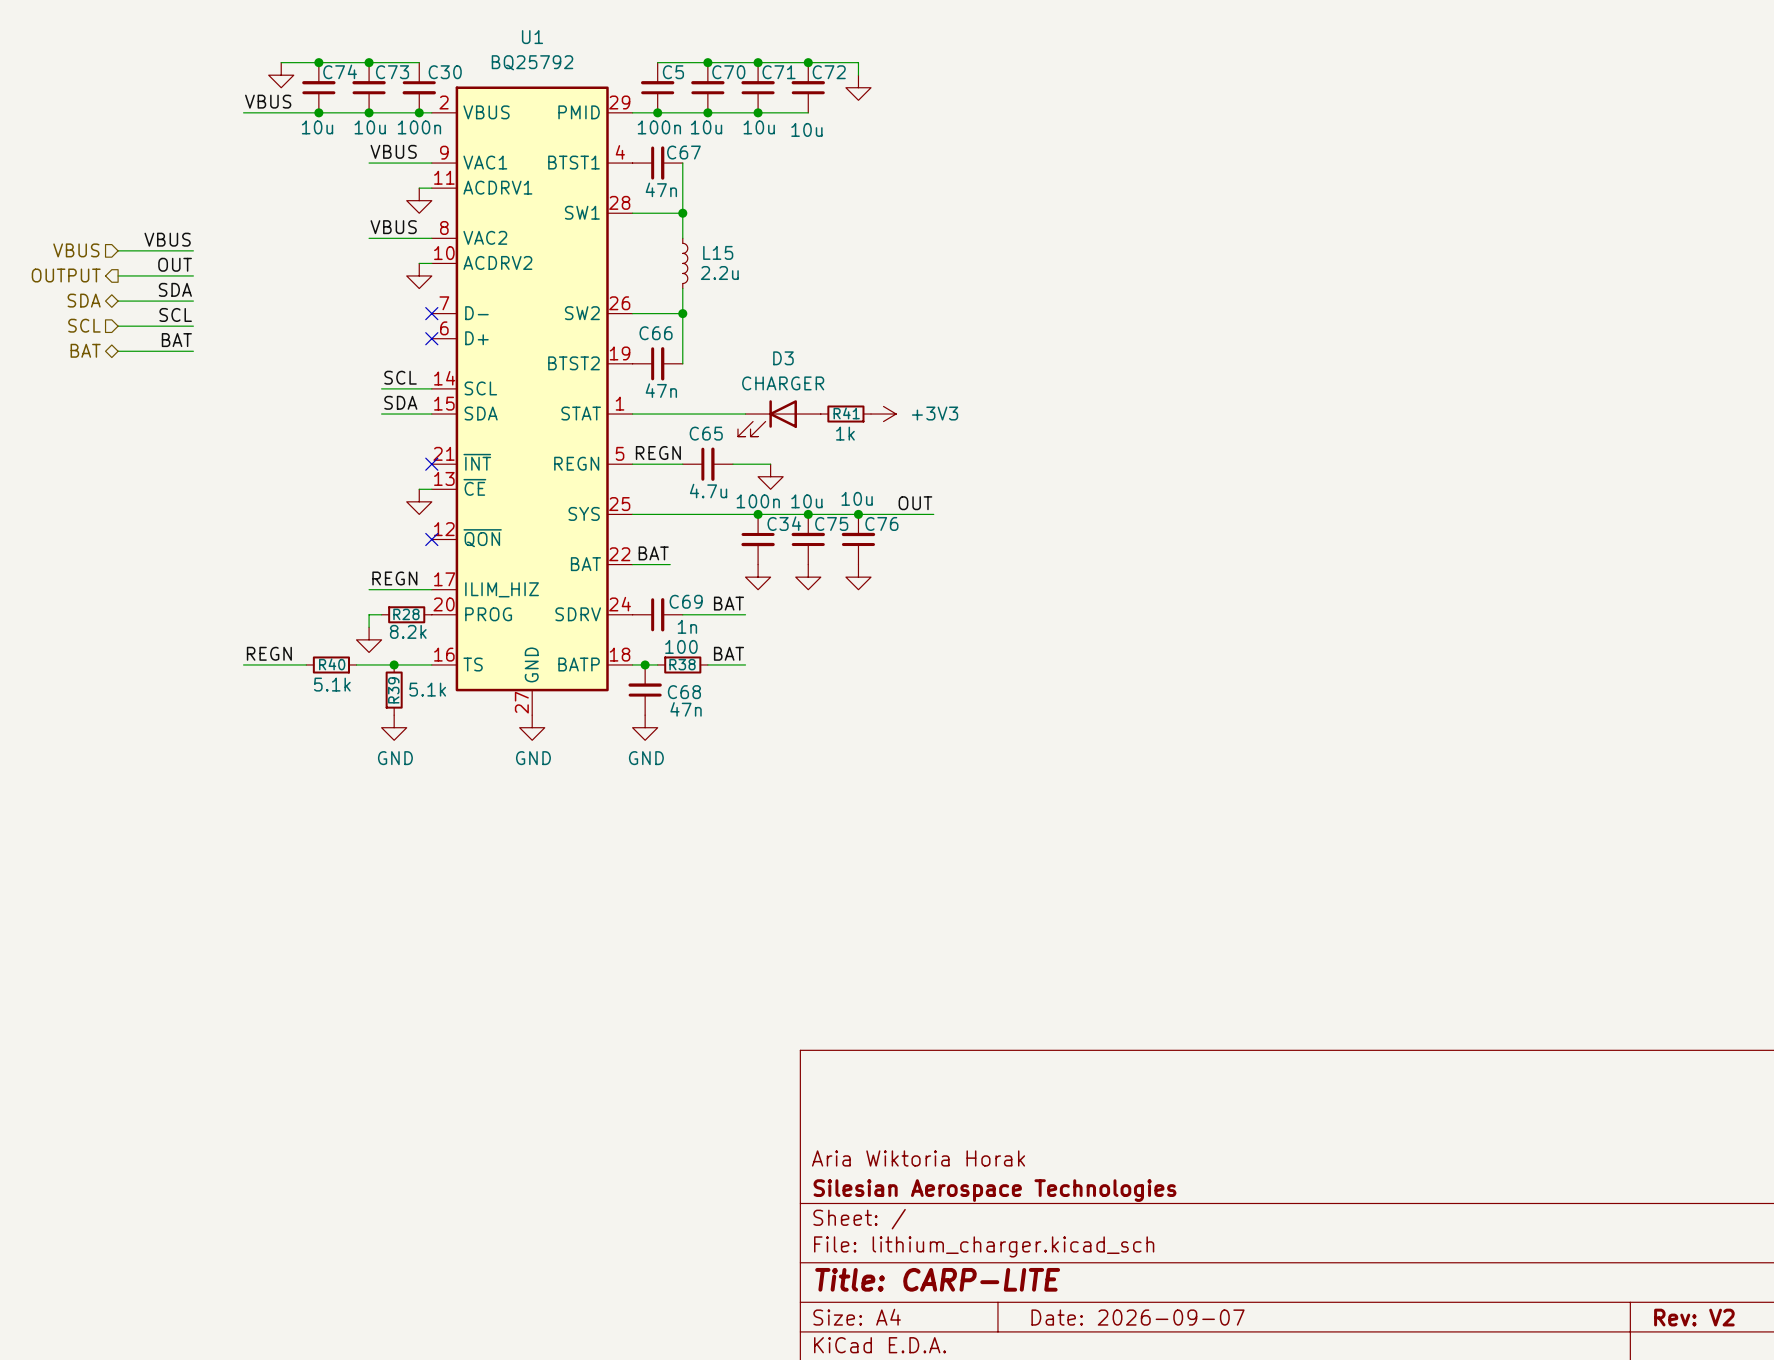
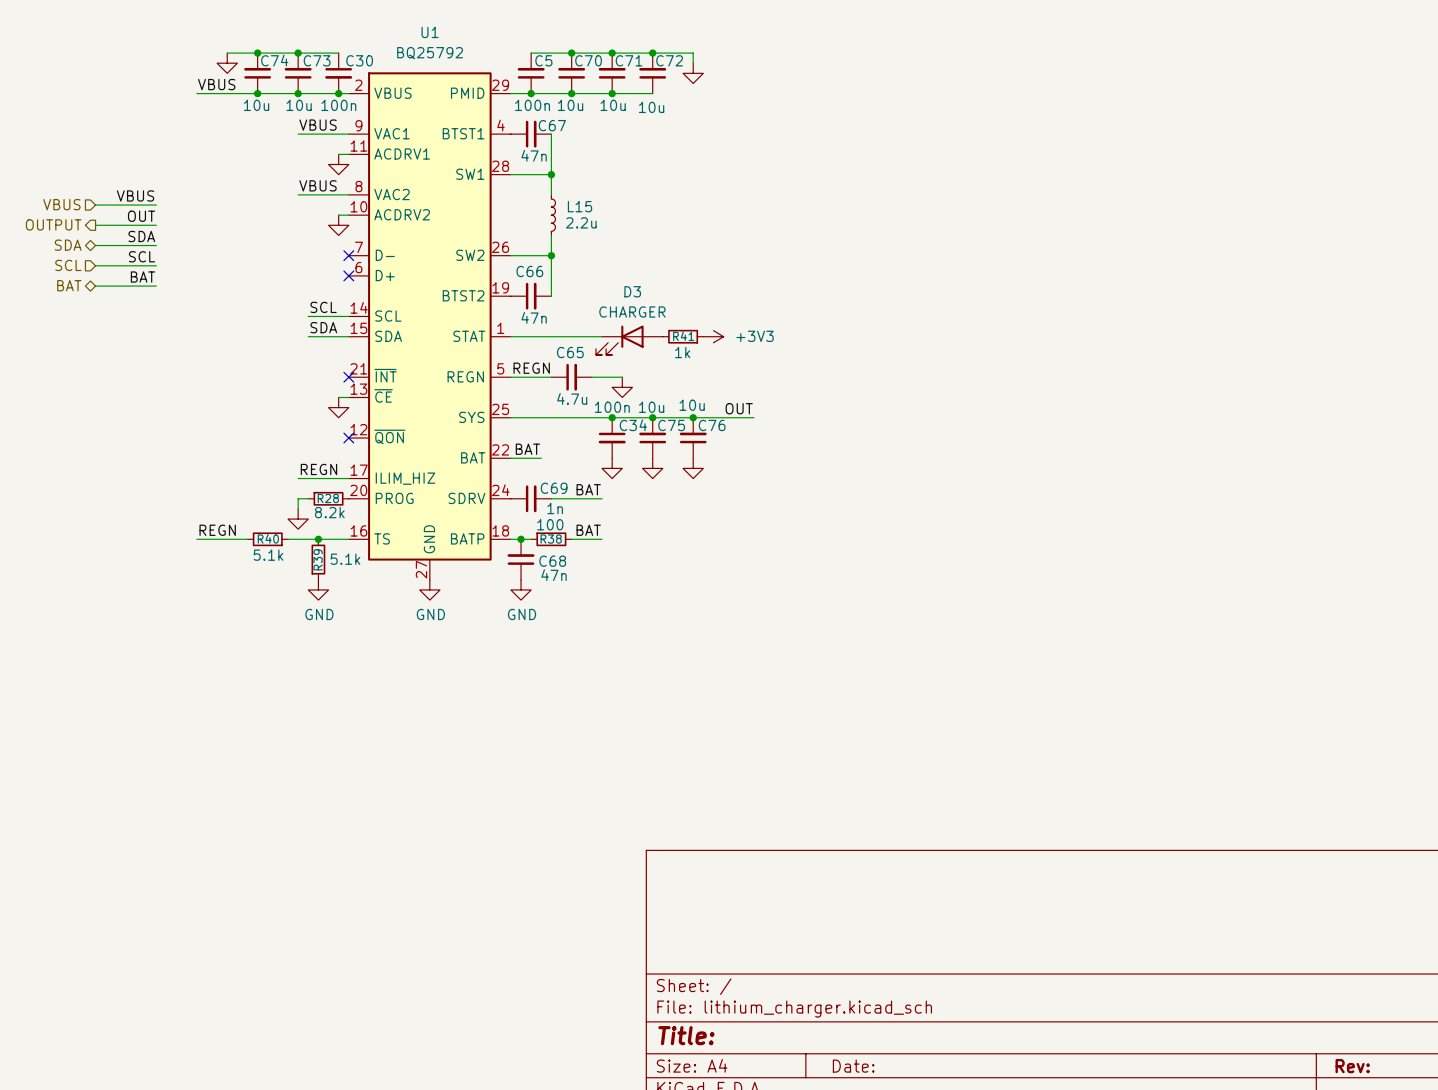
title block: Aria Wiktoria Horak (918, 1158) -> none
title block: Silesian Aerospace Technologies (994, 1190) -> none
title block: Title: CARP-LITE (937, 1279) -> Title: (686, 1035)
title block: Date: 2026-09-07 (1138, 1317) -> Date: (853, 1066)
title block: Rev: V2 (1694, 1317) -> Rev: (1352, 1066)

